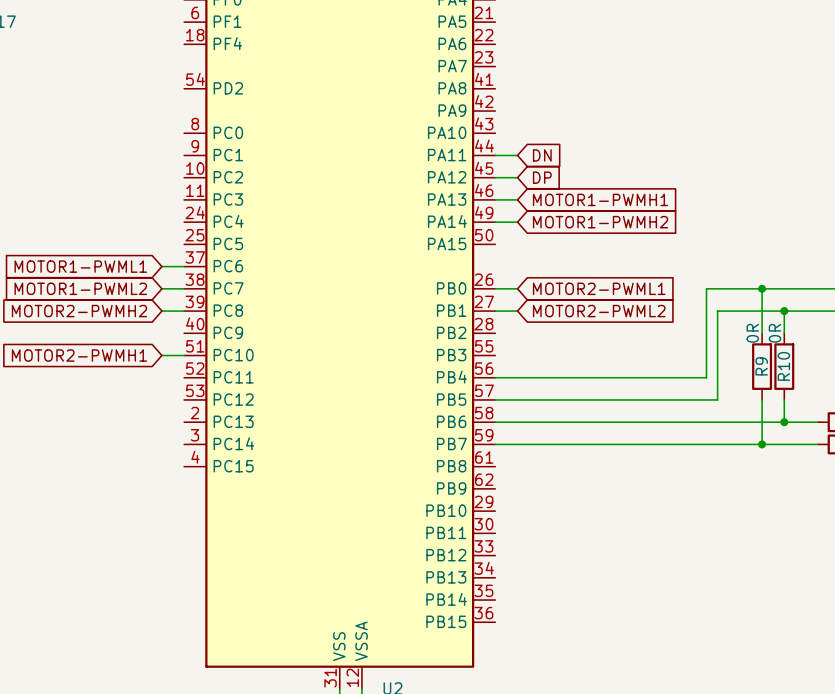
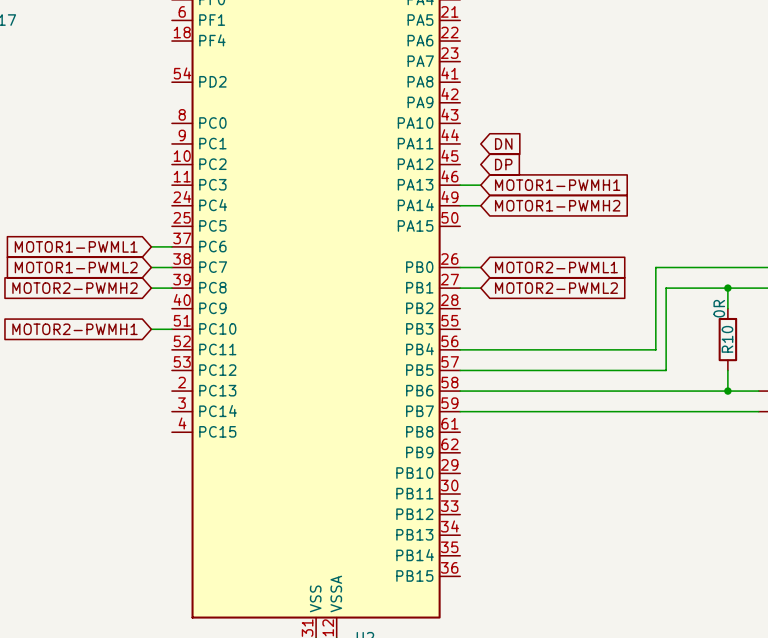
wire: (495, 155) (517, 155) -> none
wire: (495, 177) (517, 177) -> none
wire: (762, 288) (762, 333) -> none
junction: (762, 288) -> none
R9: 0R (762, 366) -> none
wire: (762, 399) (762, 444) -> none
junction: (762, 444) -> none

